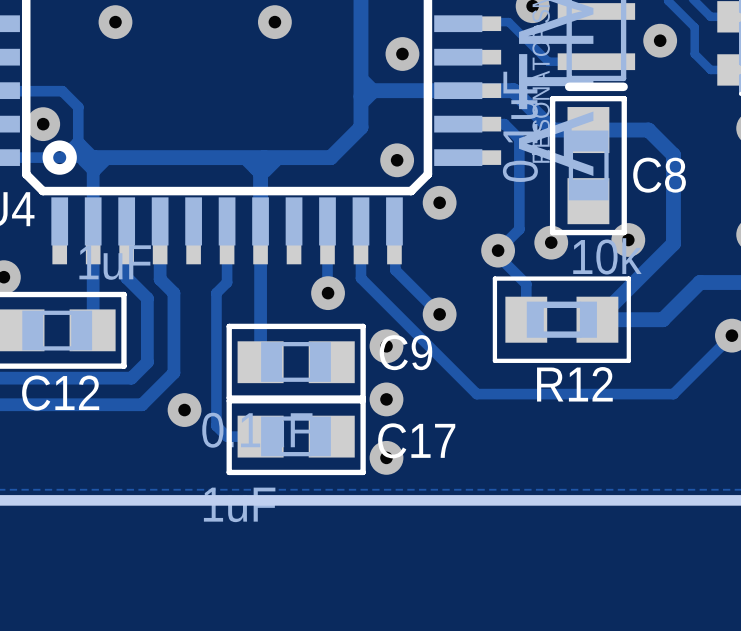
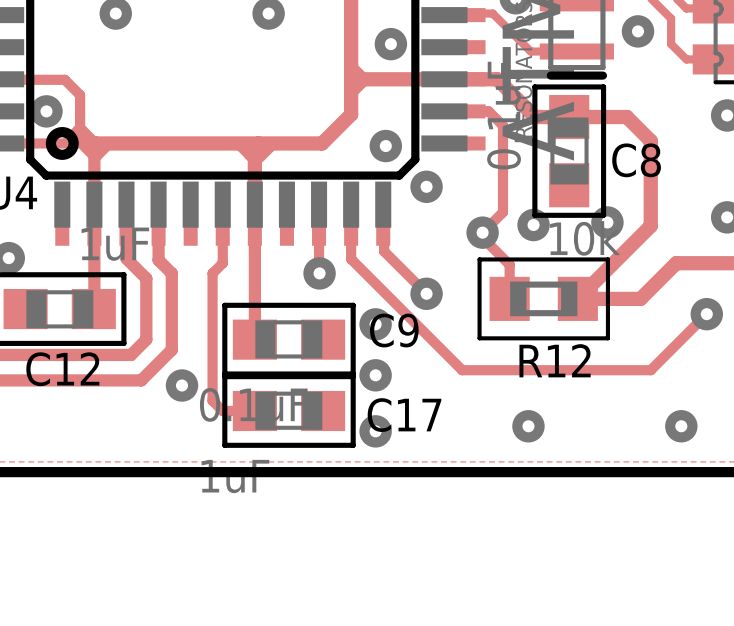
via: none -> (528, 426)
via: none -> (681, 426)

